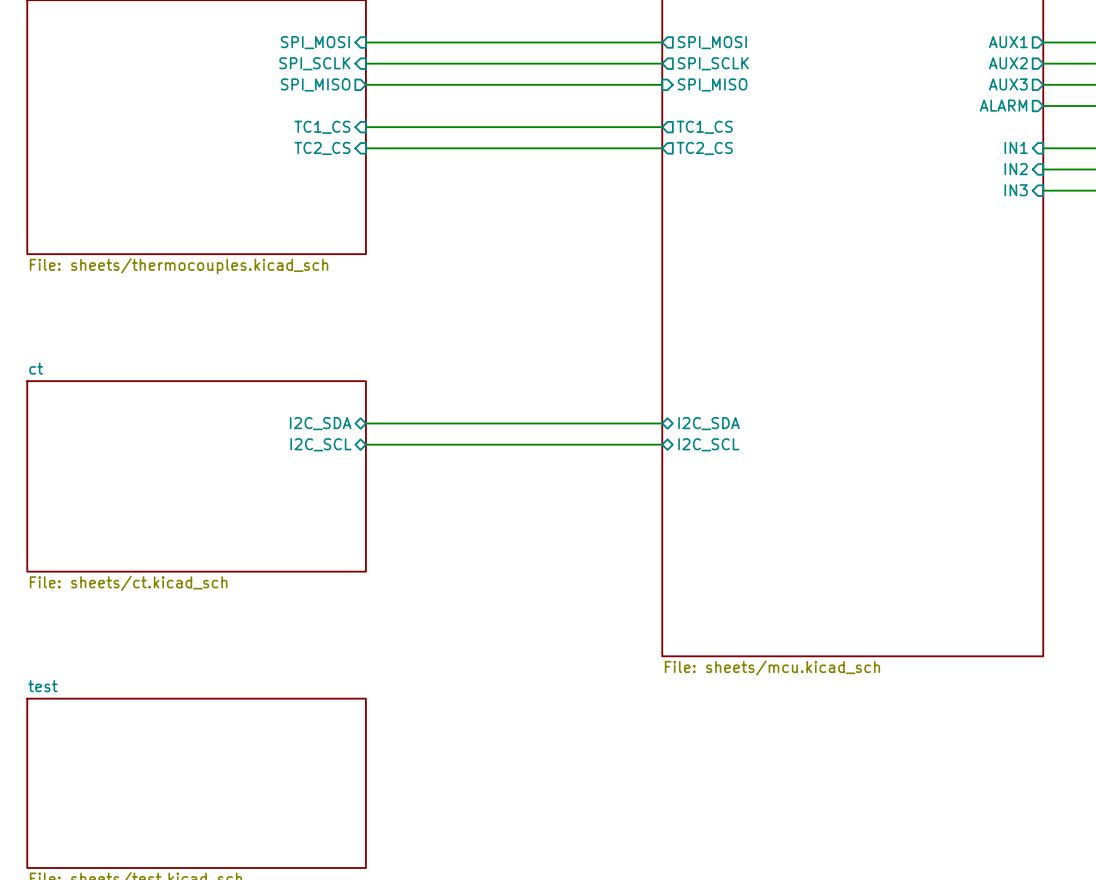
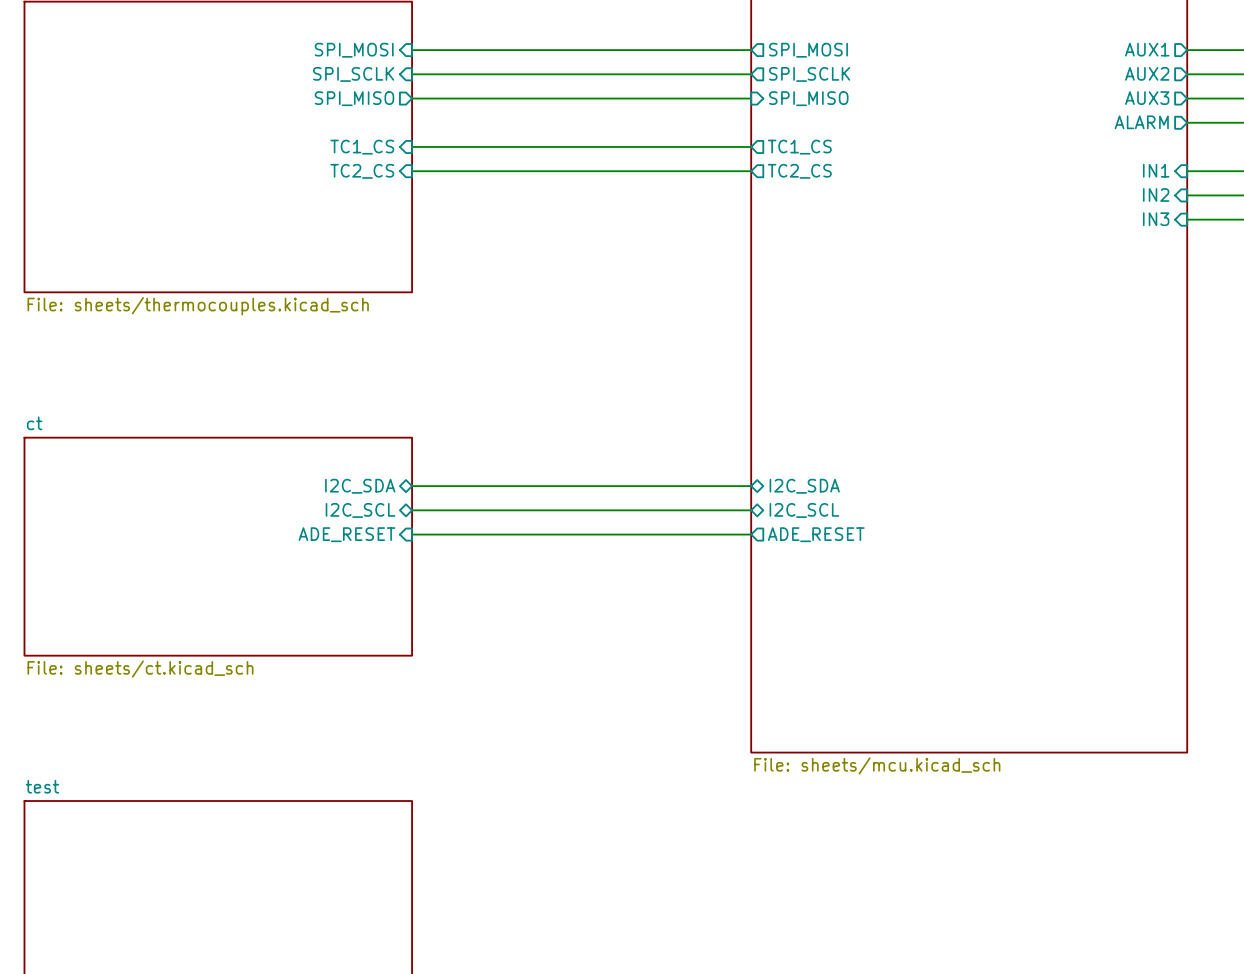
sheet pin: none -> ADE_RESET (346, 534)
wire: none -> (412, 534) (751, 534)
sheet pin: none -> ADE_RESET (816, 534)

